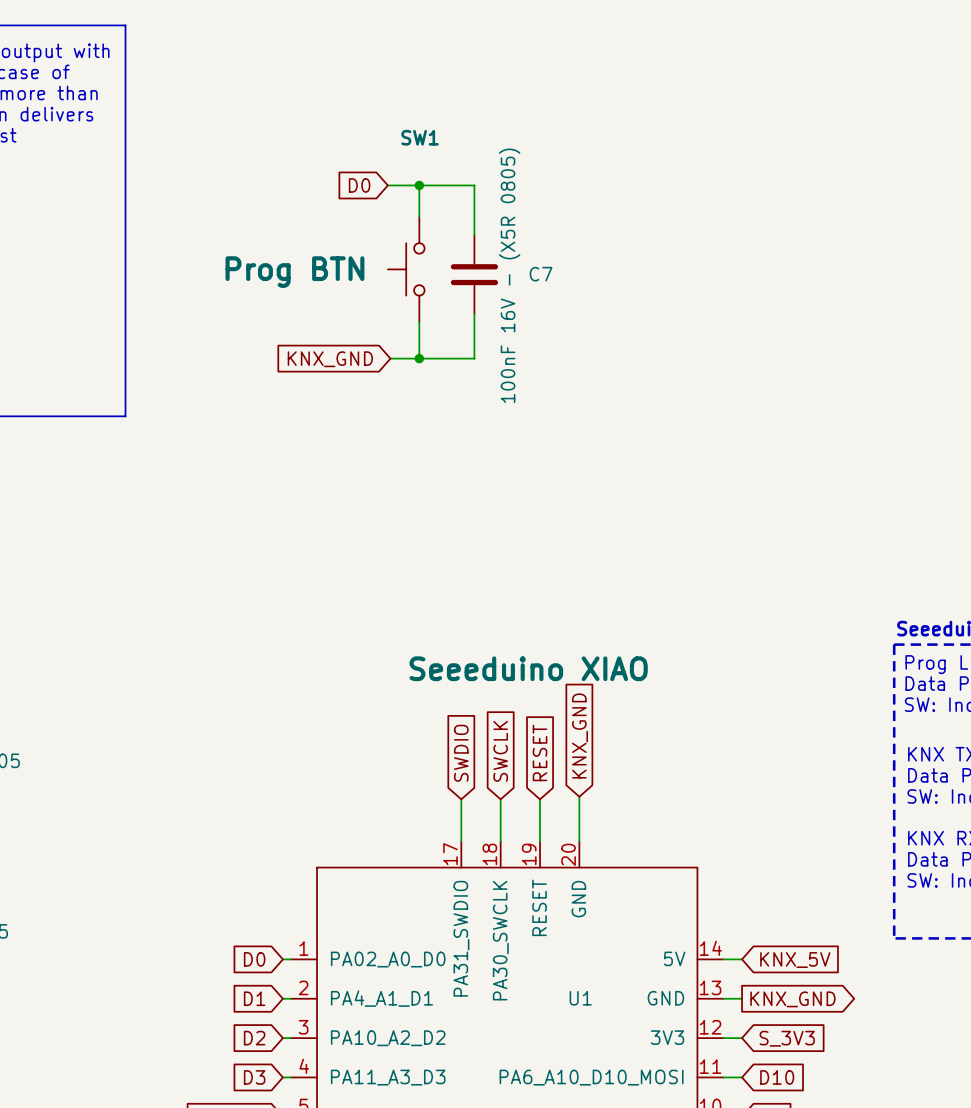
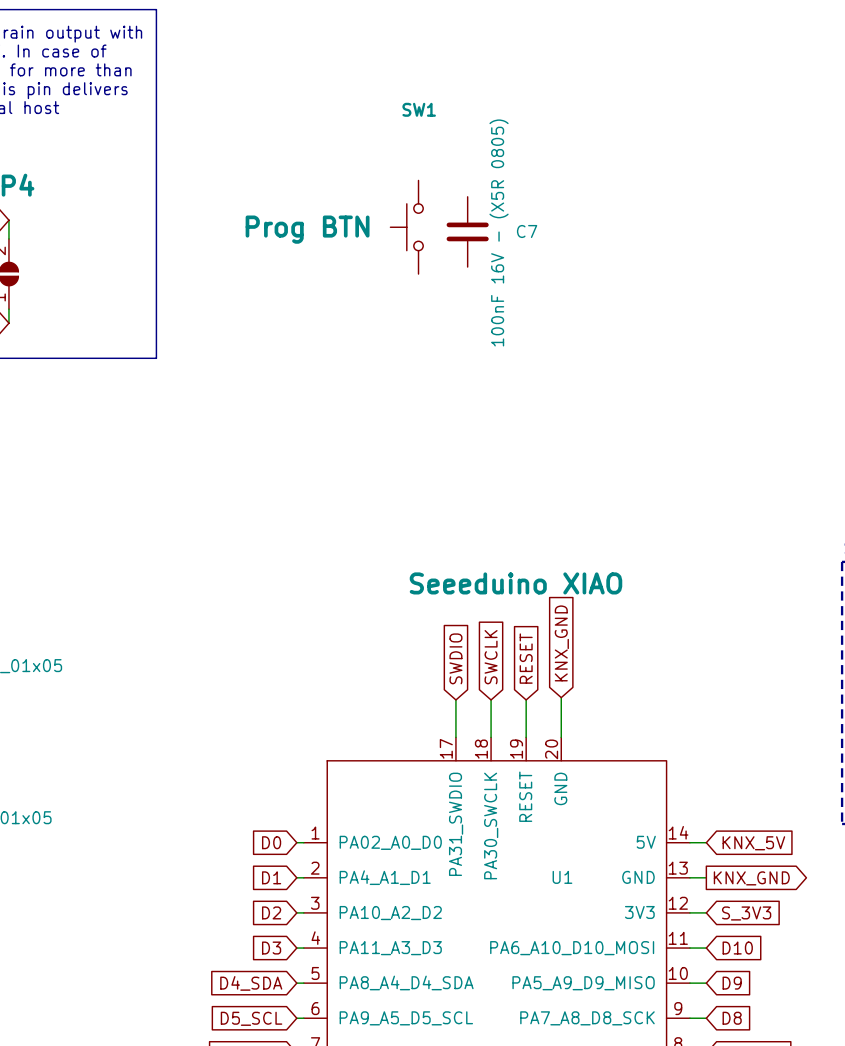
global label: D0 (359, 185) -> none
wire: (387, 185) (474, 185) (474, 235) -> none
wire: (419, 185) (419, 216) -> none
junction: (419, 185) -> none
wire: (474, 314) (474, 358) (390, 358) -> none
wire: (419, 321) (419, 358) -> none
junction: (419, 358) -> none
global label: KNX_GND (330, 359) -> none

